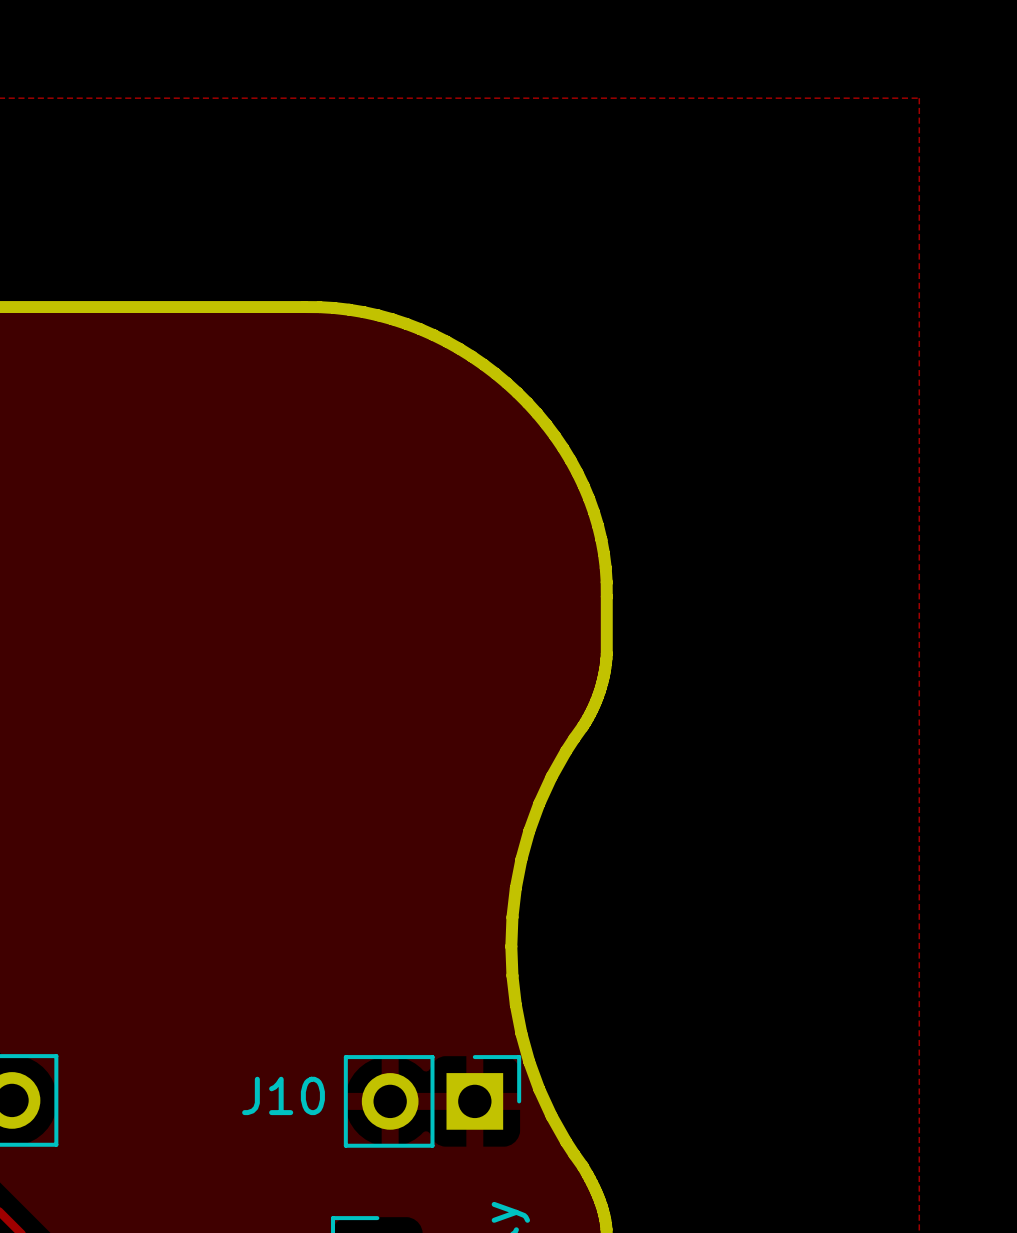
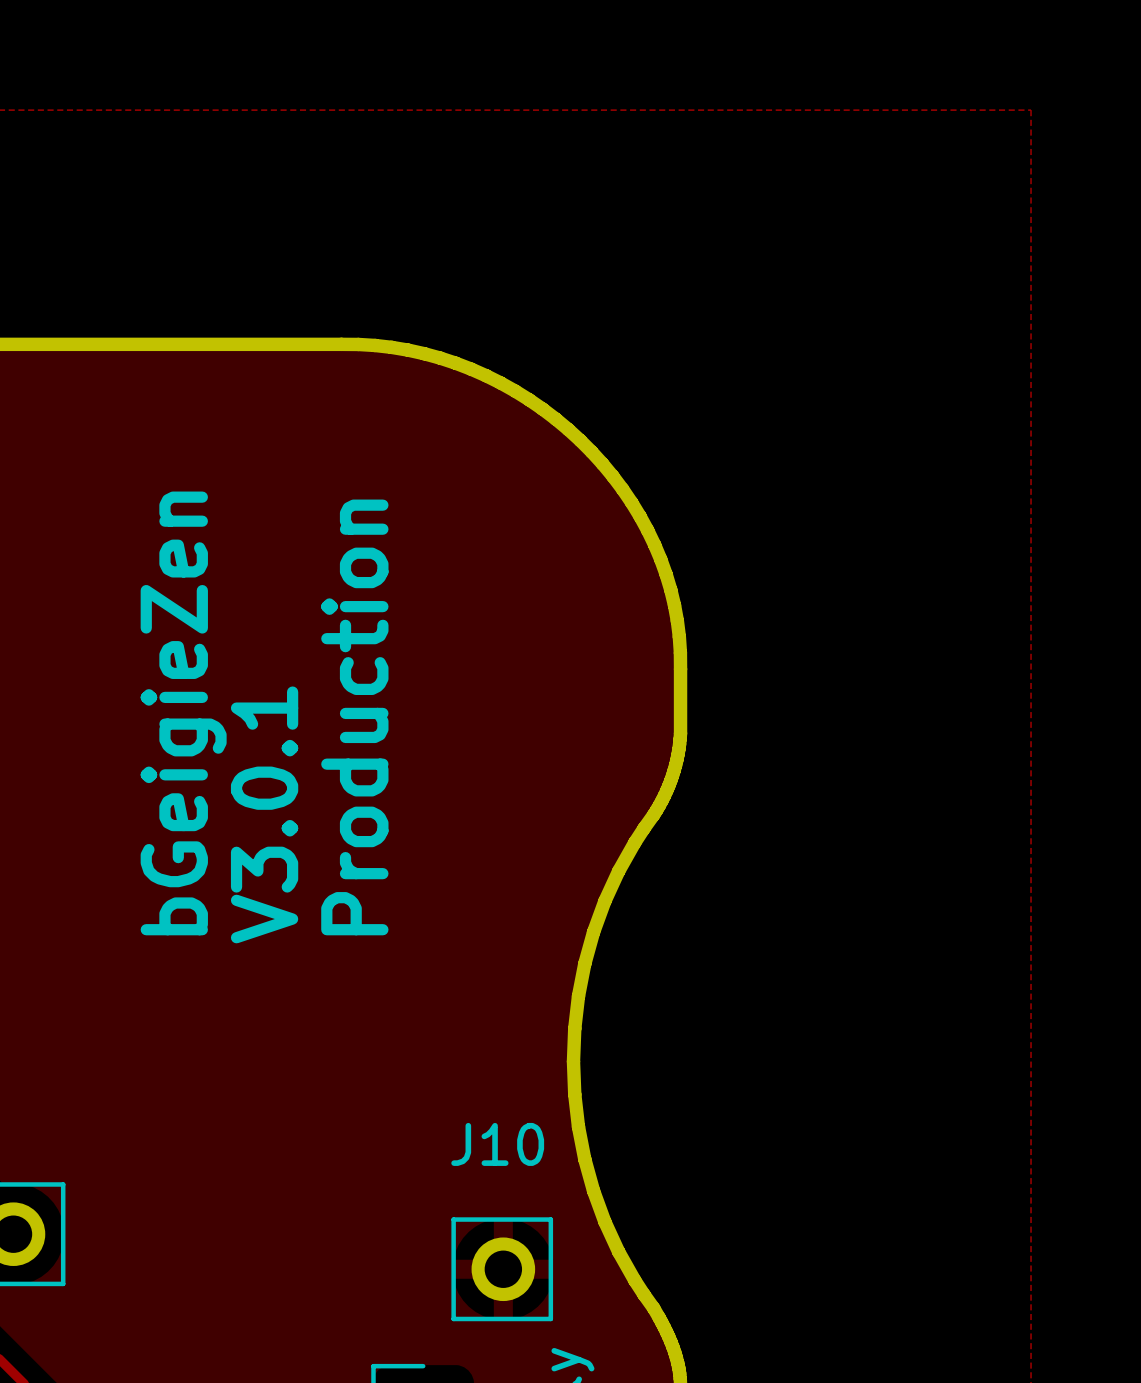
text: none -> bGeigieZen (183, 713)
text: none -> Production (354, 717)
text: none -> V3.0.1 (264, 814)
J10 footprint: [343, 1055, 522, 1148] -> [451, 1217, 554, 1322]
J10 name position: J10 (283, 1095) -> J10 (497, 1144)

